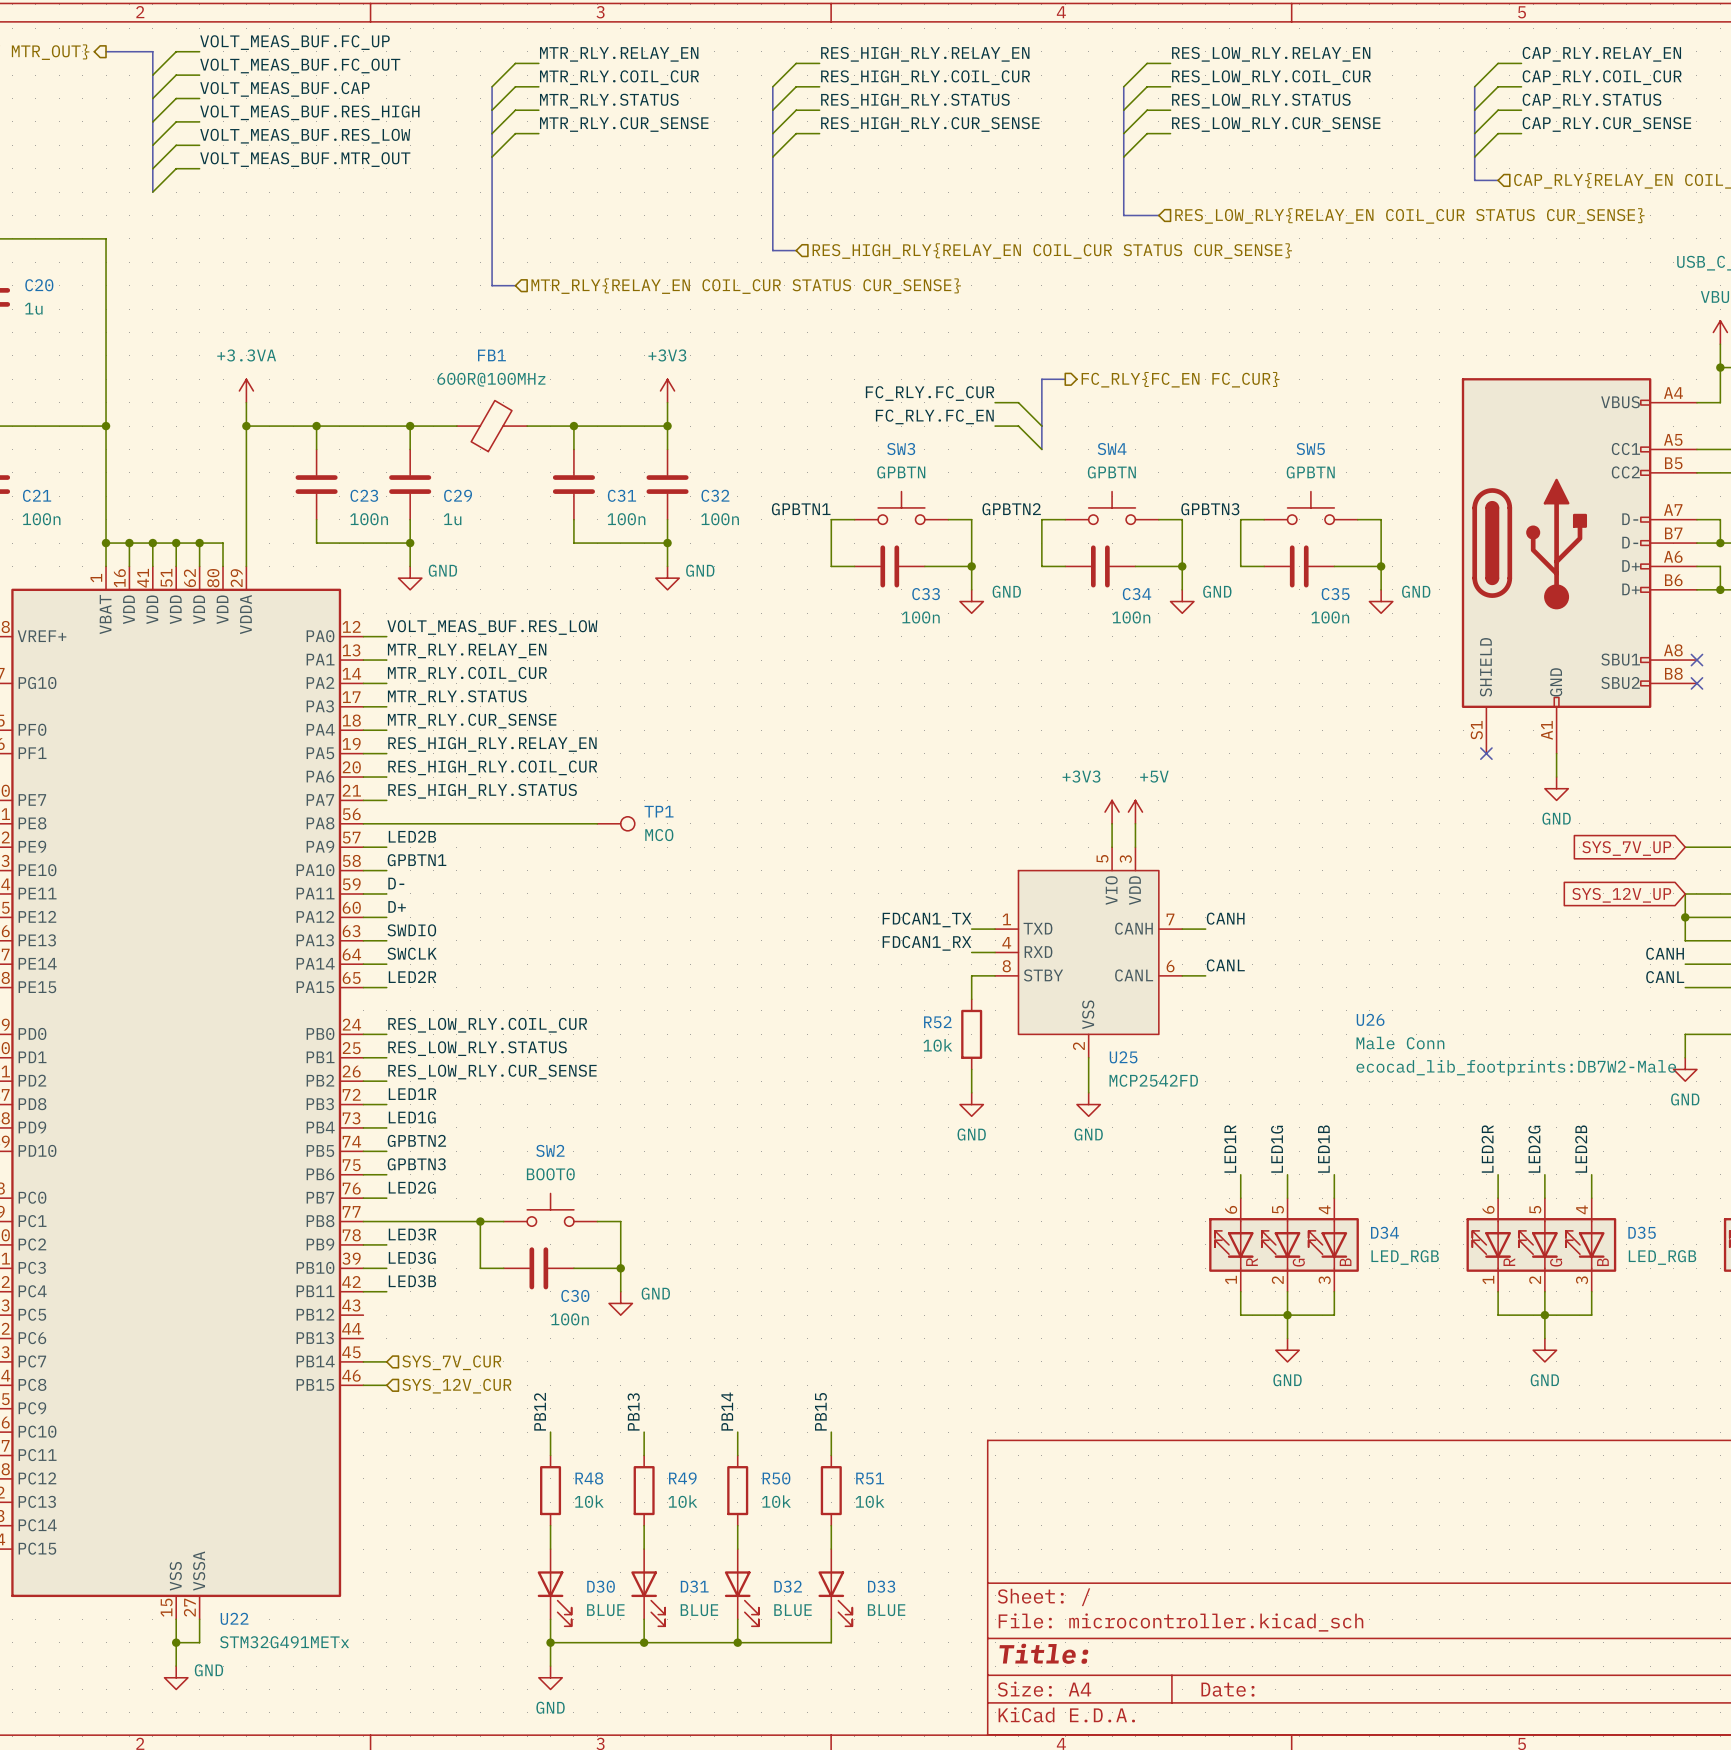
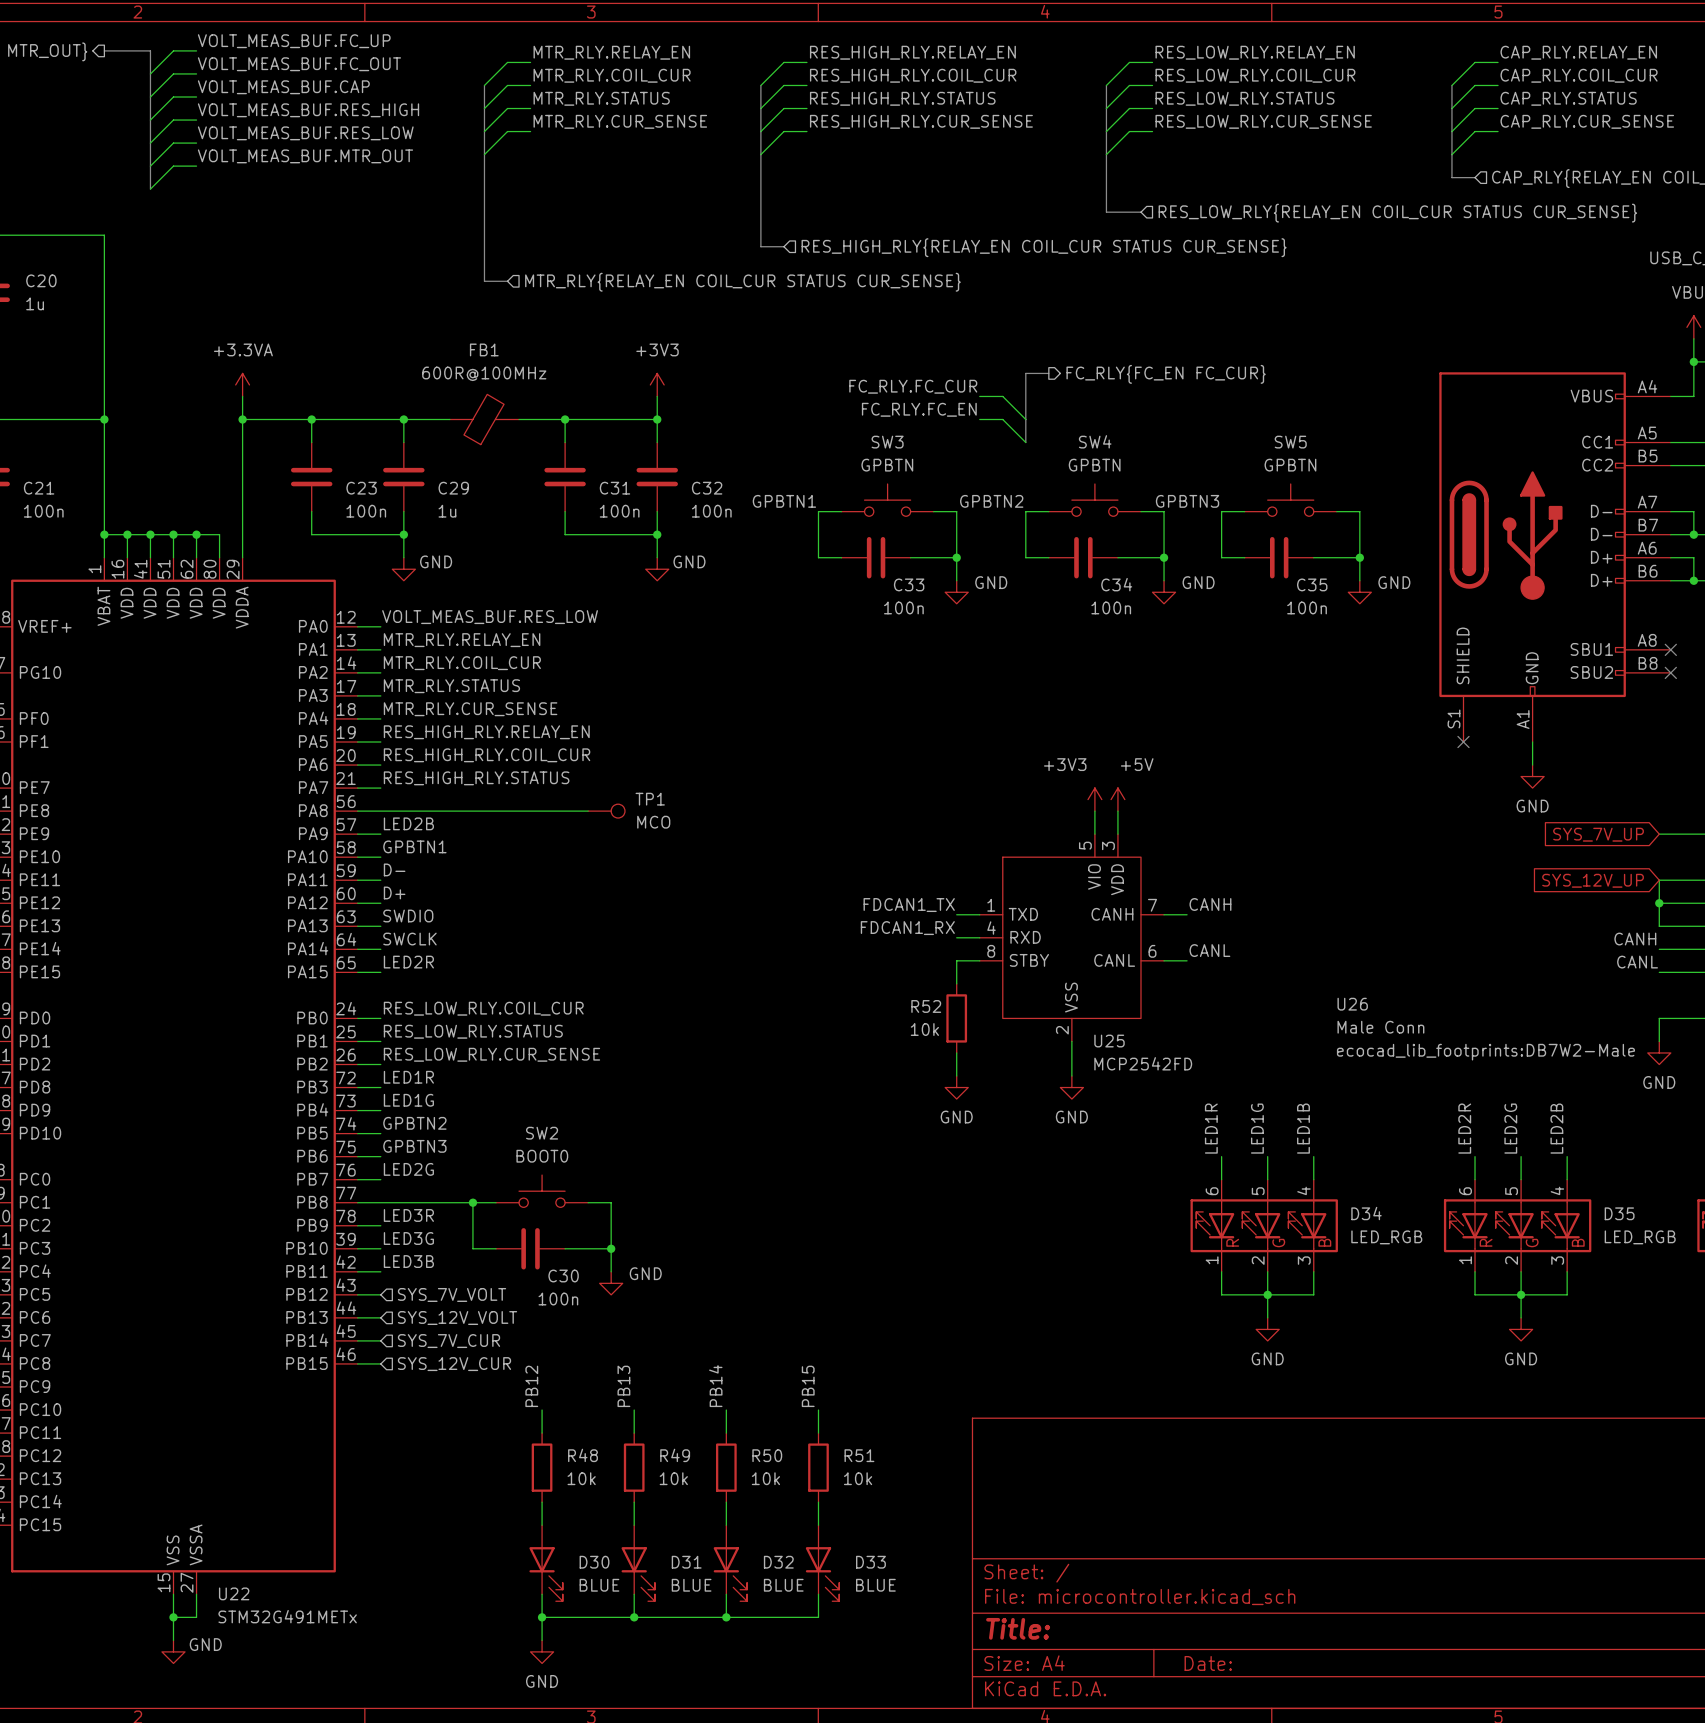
wire: none -> (357, 1294) (380, 1294)
hierarchical label: none -> SYS_7V_VOLT (452, 1294)
wire: none -> (357, 1317) (380, 1317)
hierarchical label: none -> SYS_12V_VOLT (457, 1318)

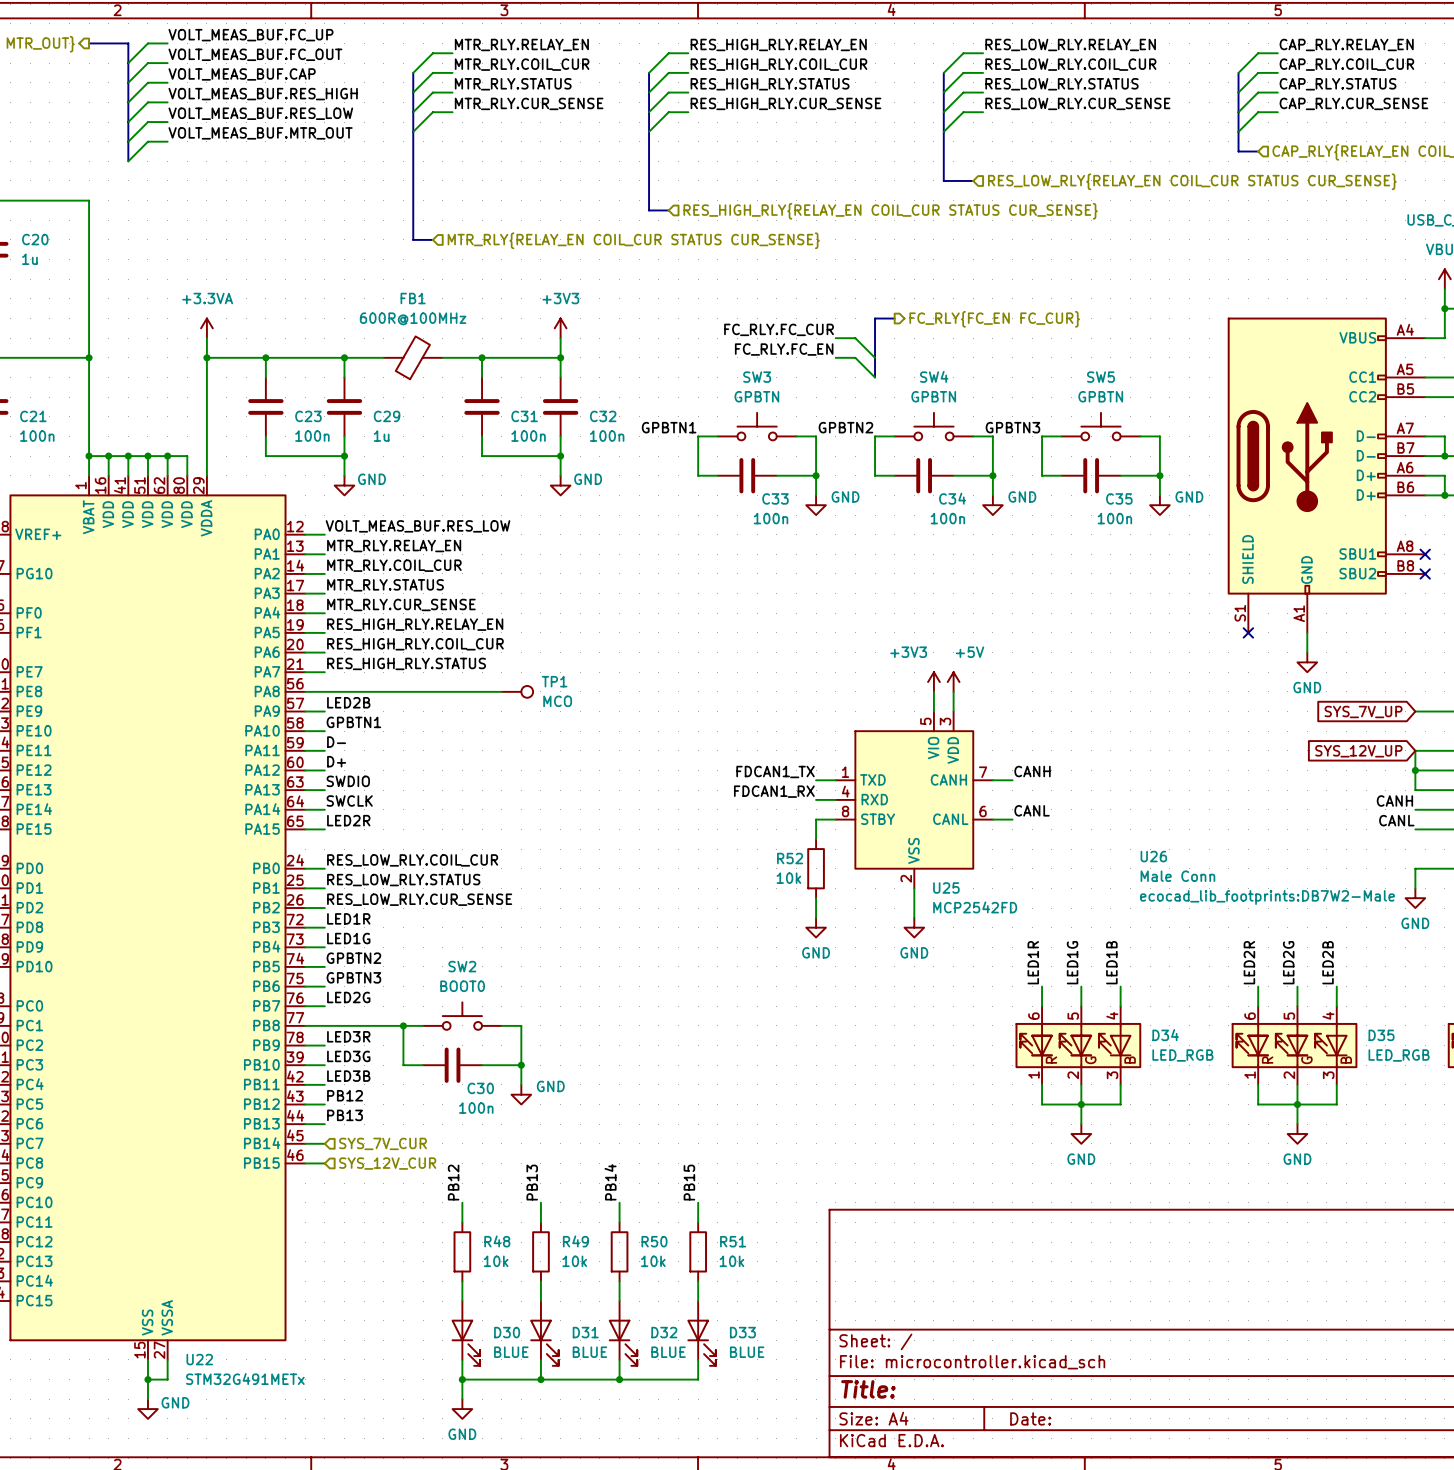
label: none -> PB12 (345, 1095)
hierarchical label: SYS_7V_VOLT (452, 1294) -> none
label: none -> PB13 (345, 1115)
hierarchical label: SYS_12V_VOLT (457, 1318) -> none

